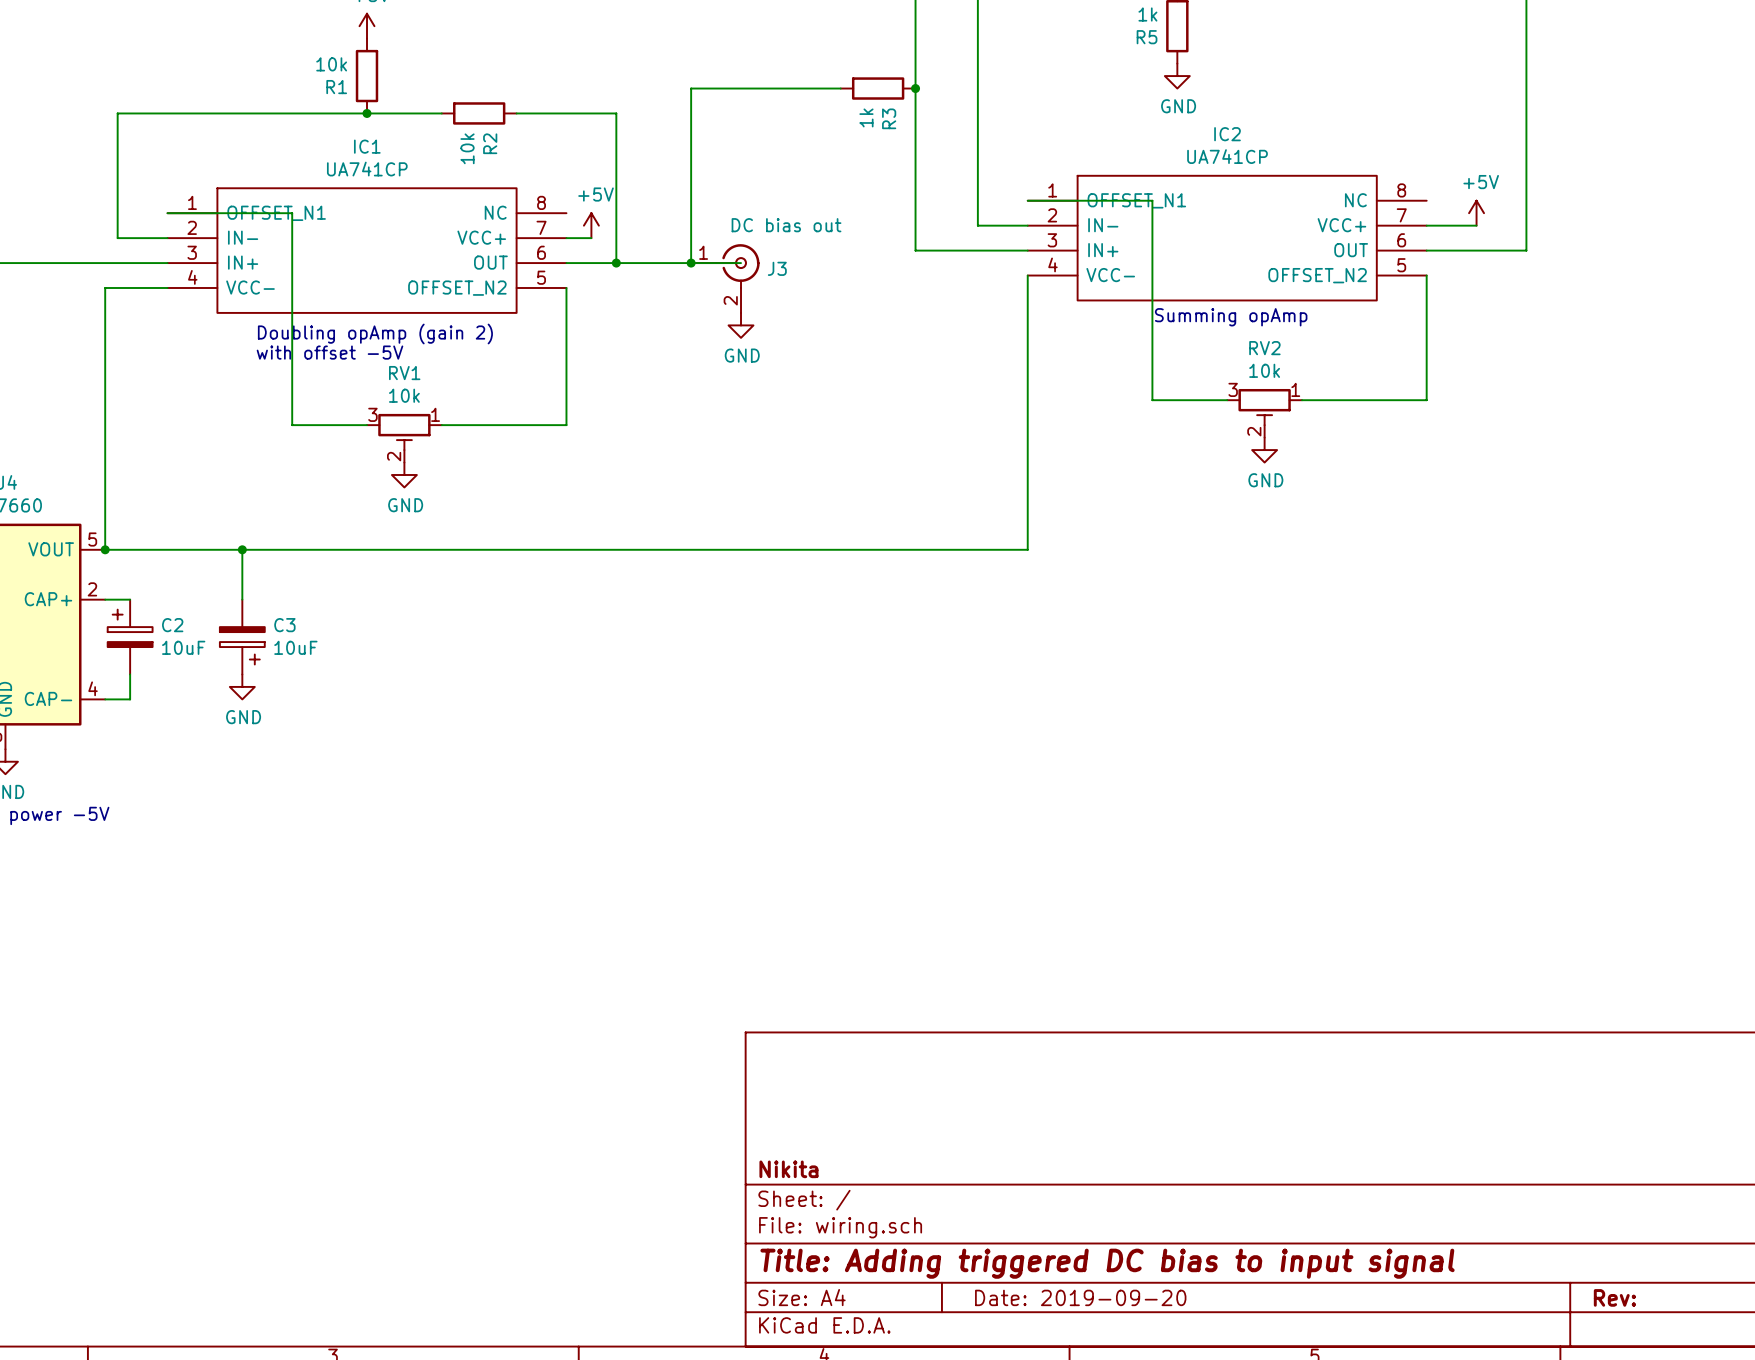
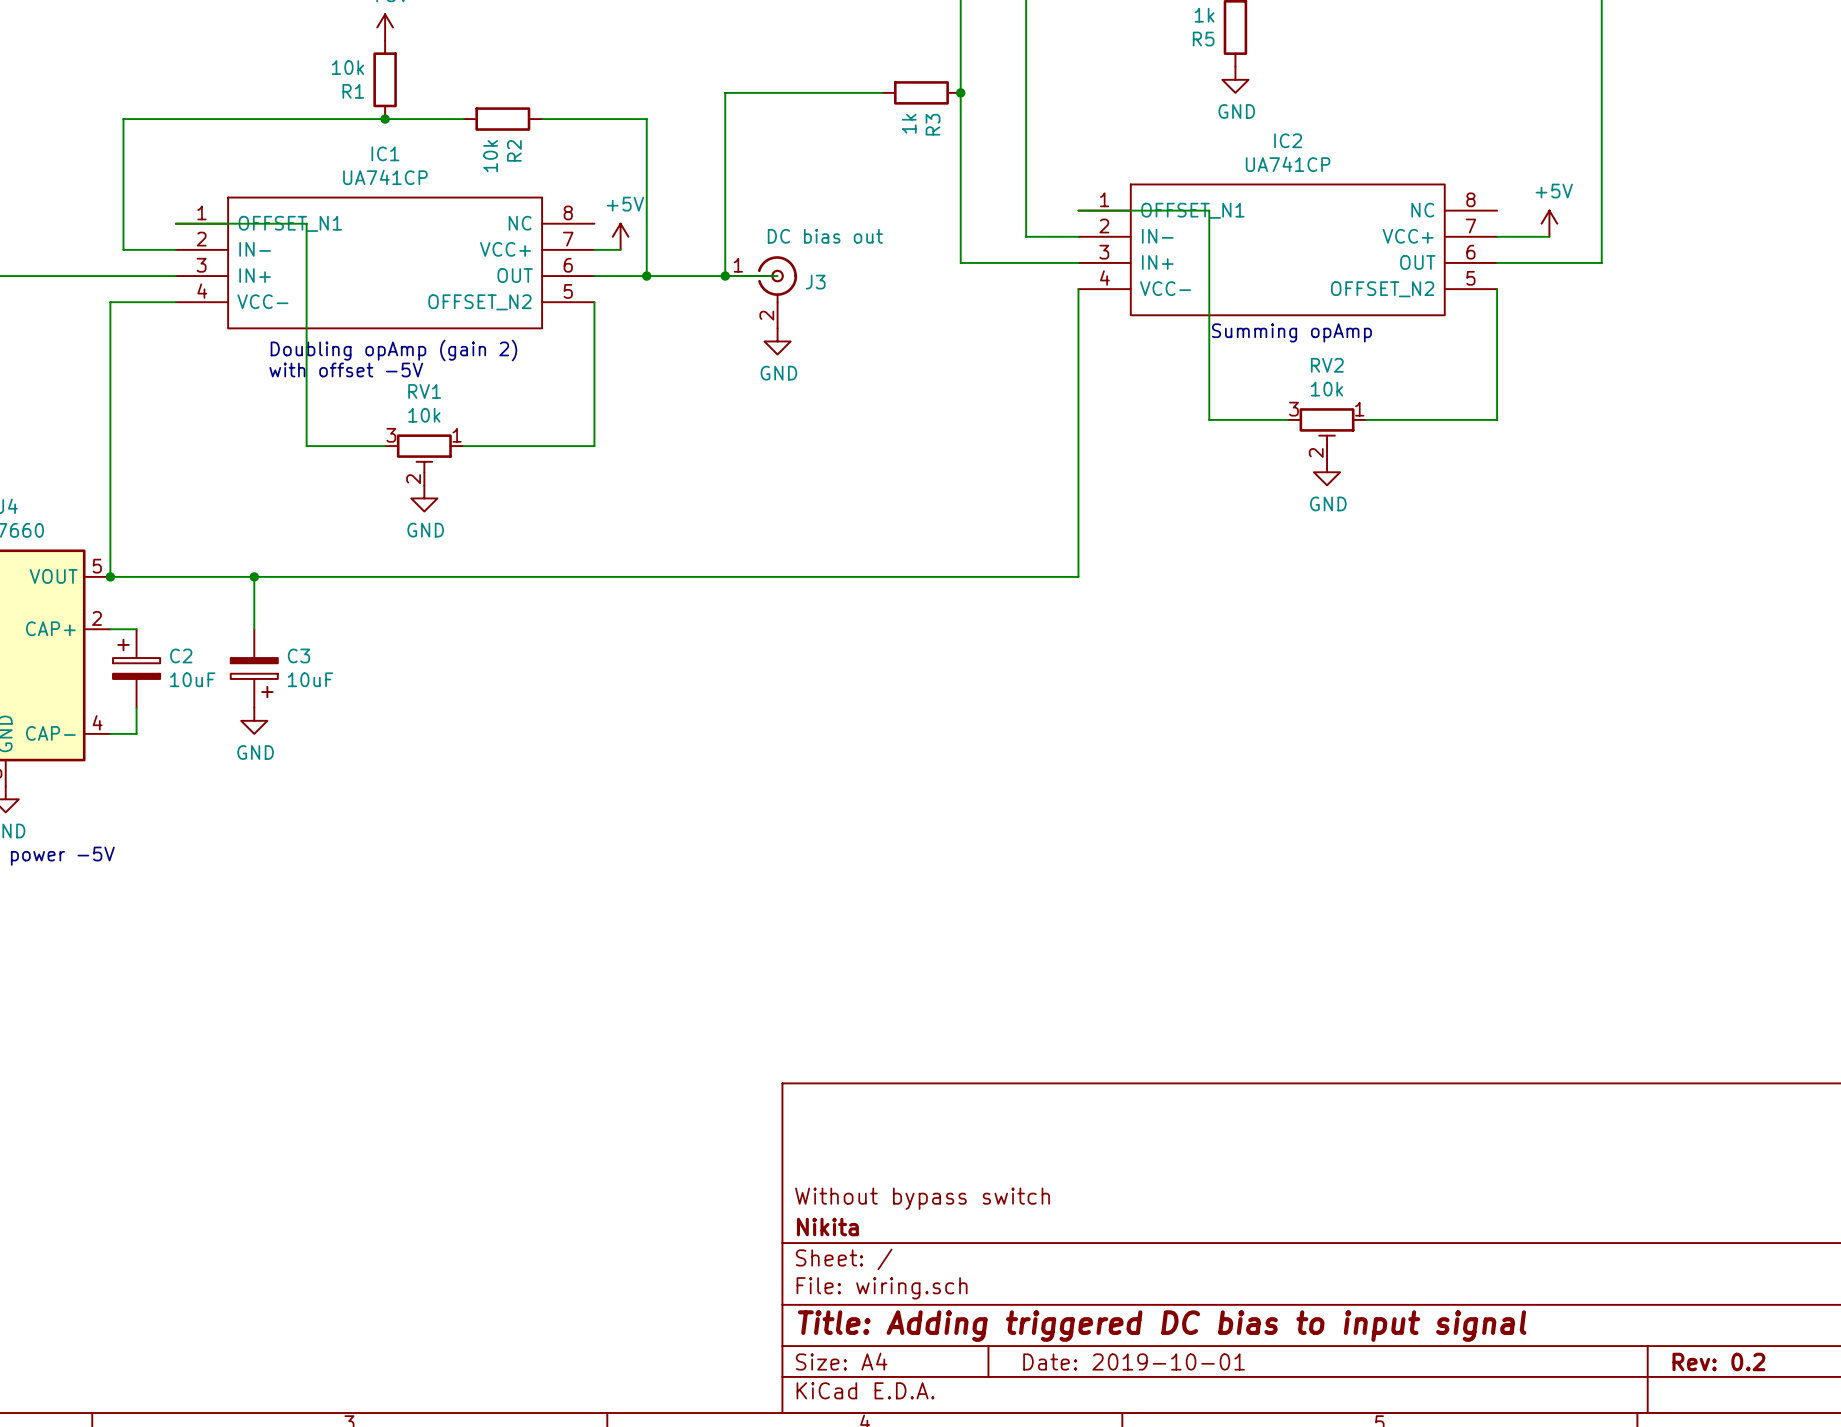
title block: none -> Without bypass switch (922, 1198)
title block: Date: 2019-09-20 (1080, 1297) -> Date: 2019-10-01 (1134, 1361)
title block: Rev: (1614, 1297) -> Rev: 0.2 (1718, 1361)

